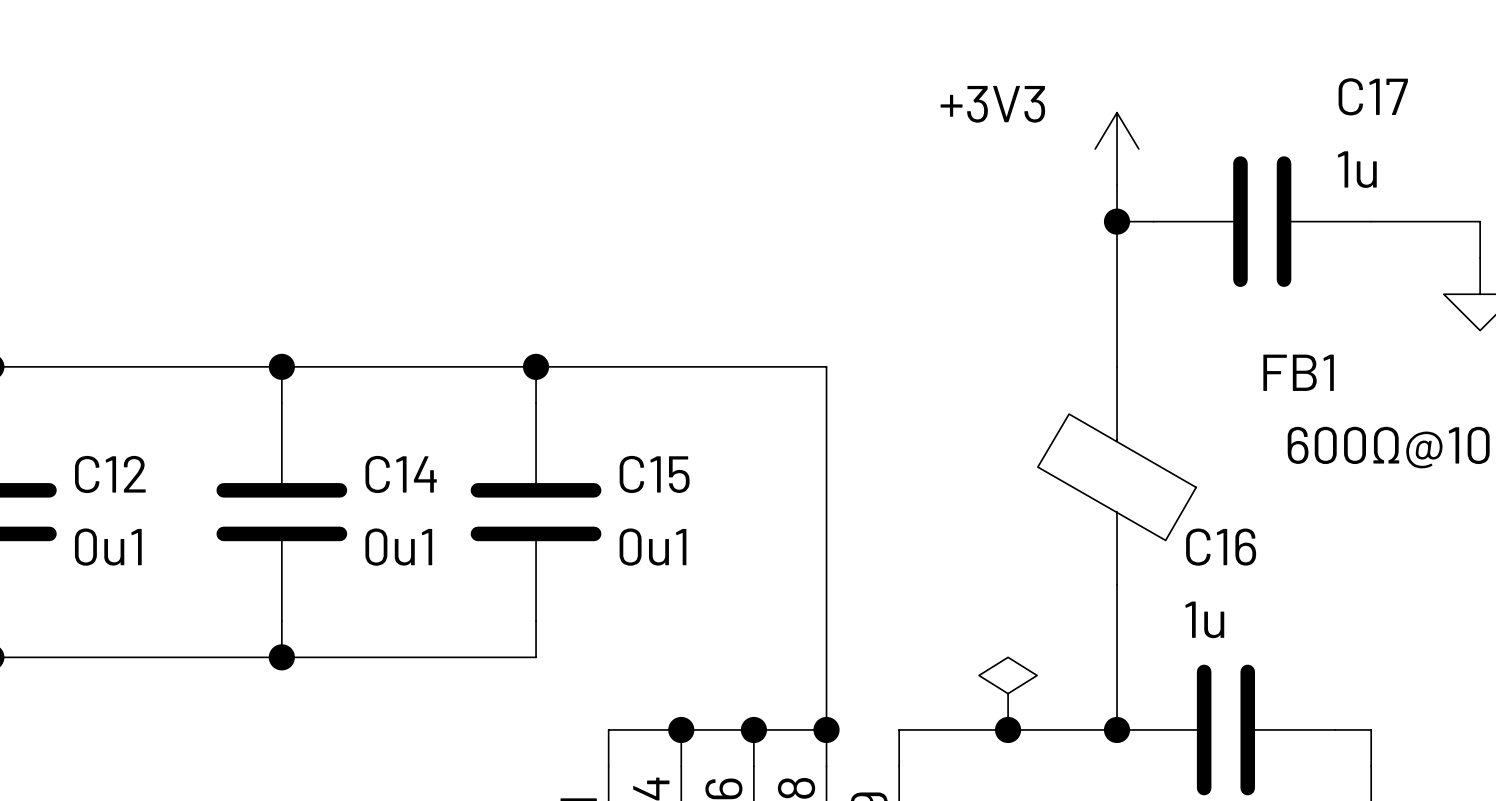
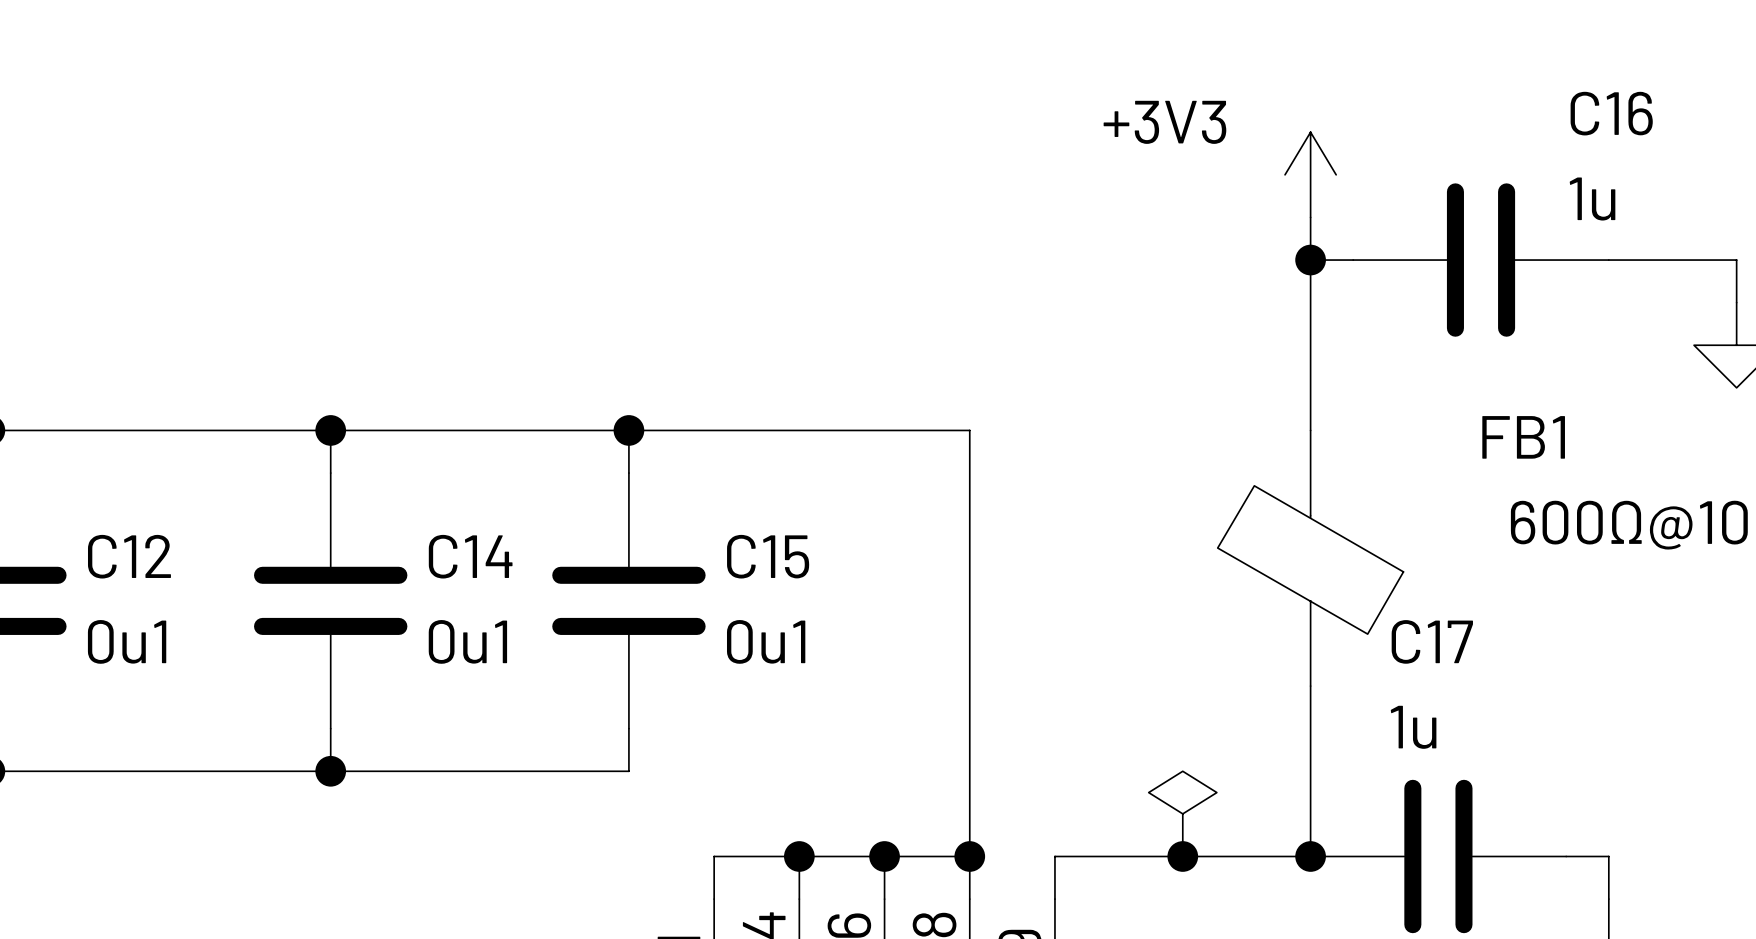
C17 name: C17 (1373, 96) -> C16 (1611, 113)
C16 name: C16 (1221, 547) -> C17 (1432, 641)

